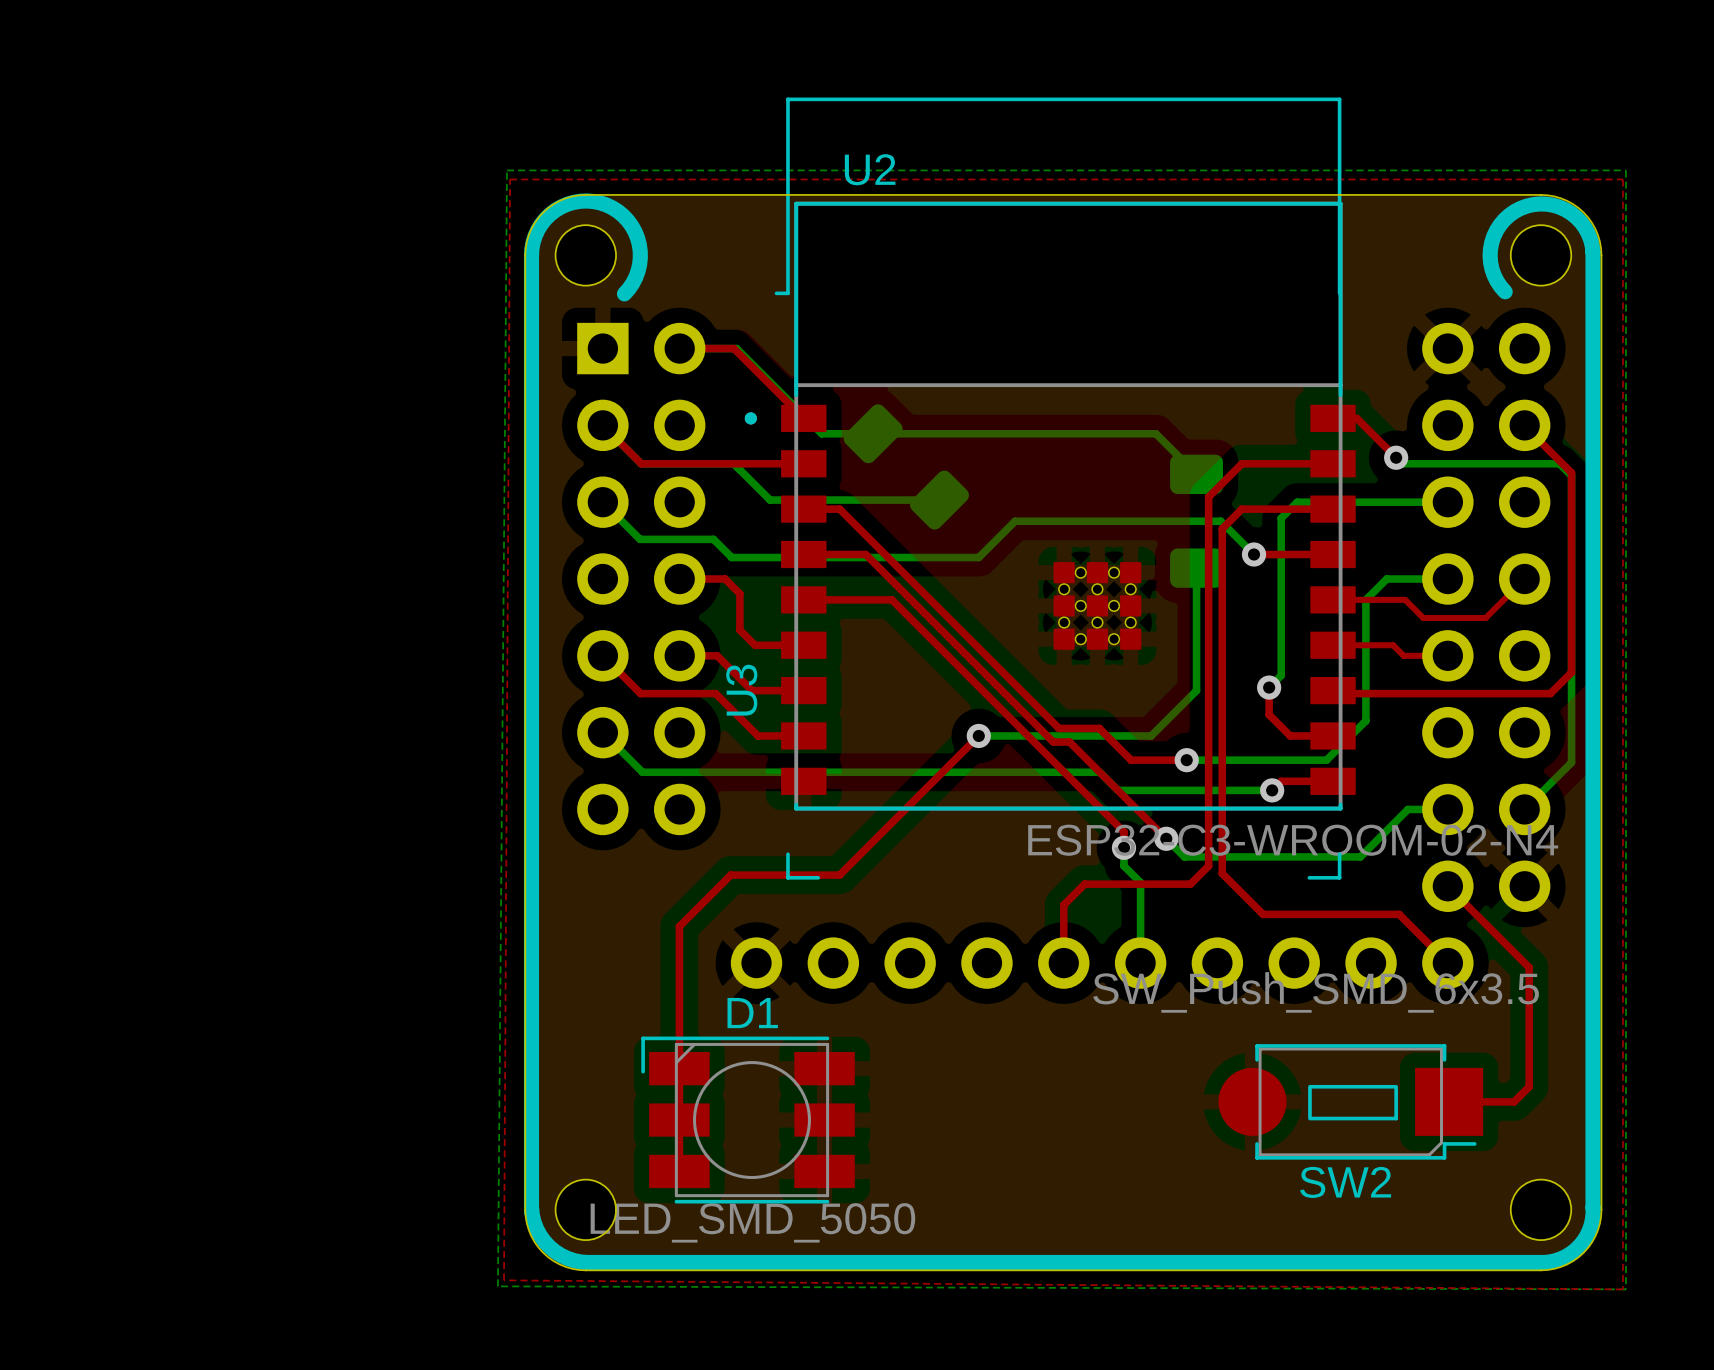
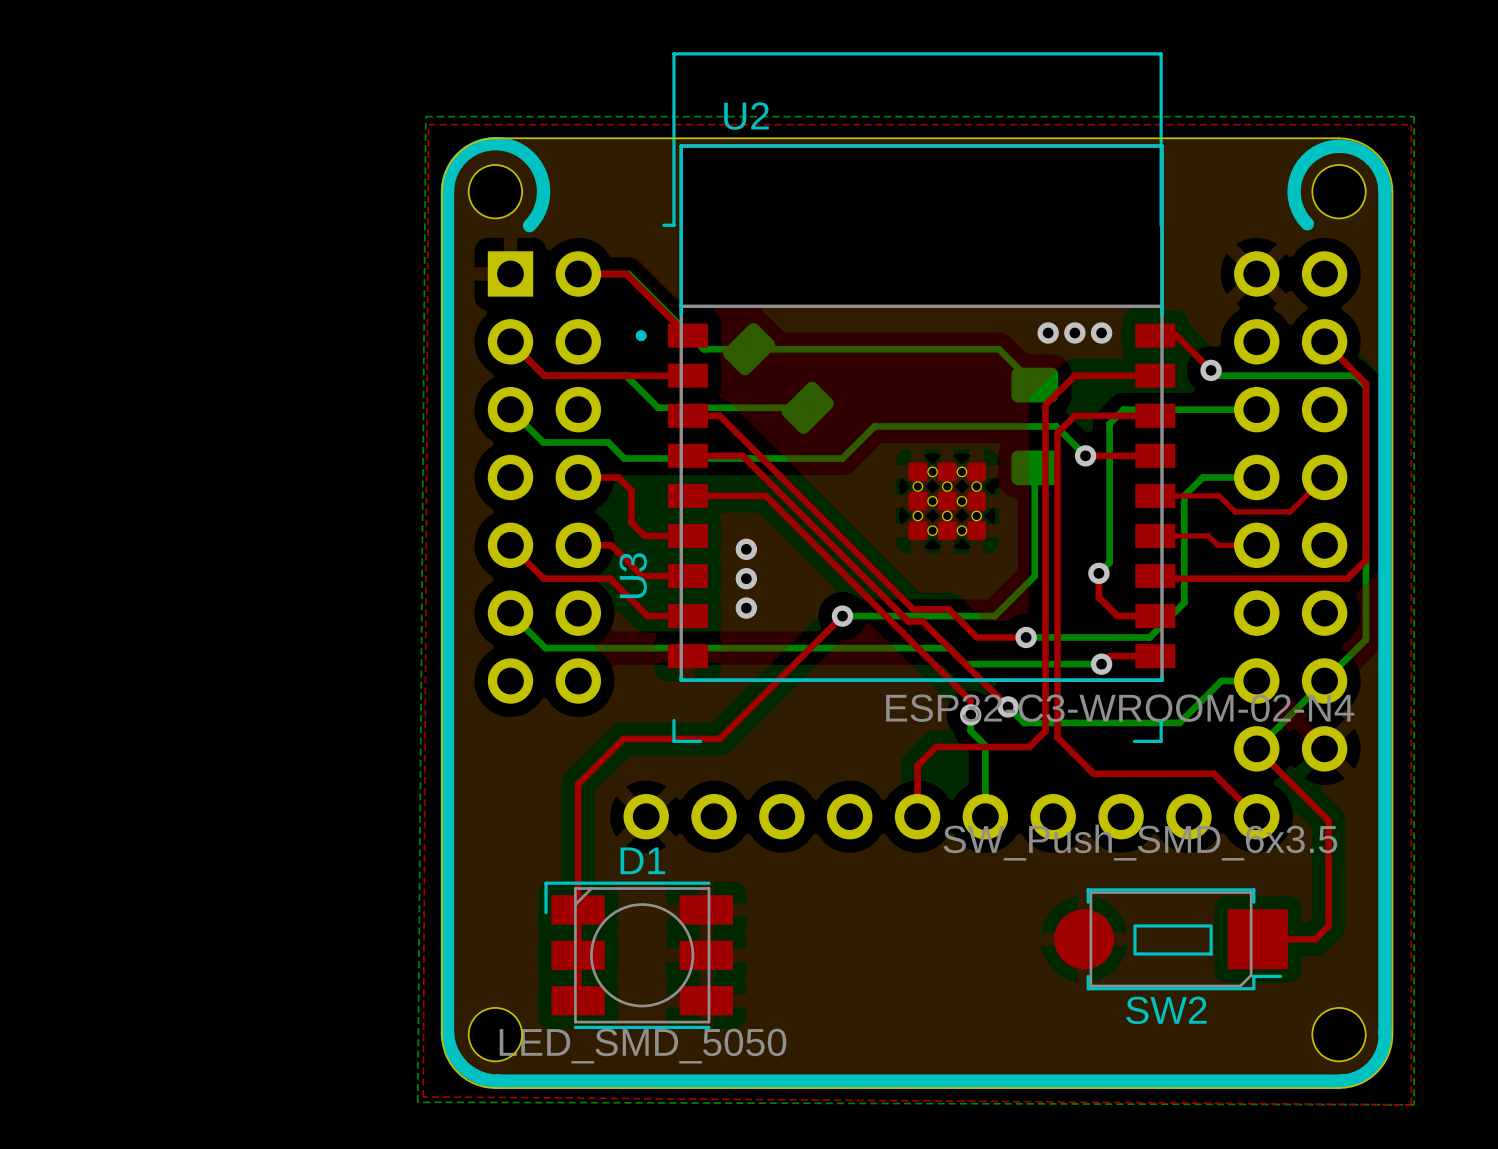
via: none -> (1048, 332)
via: none -> (1074, 332)
via: none -> (1101, 332)
via: none -> (746, 549)
via: none -> (746, 578)
via: none -> (746, 608)
bottom track: none -> (1324, 681) (1256, 748)

